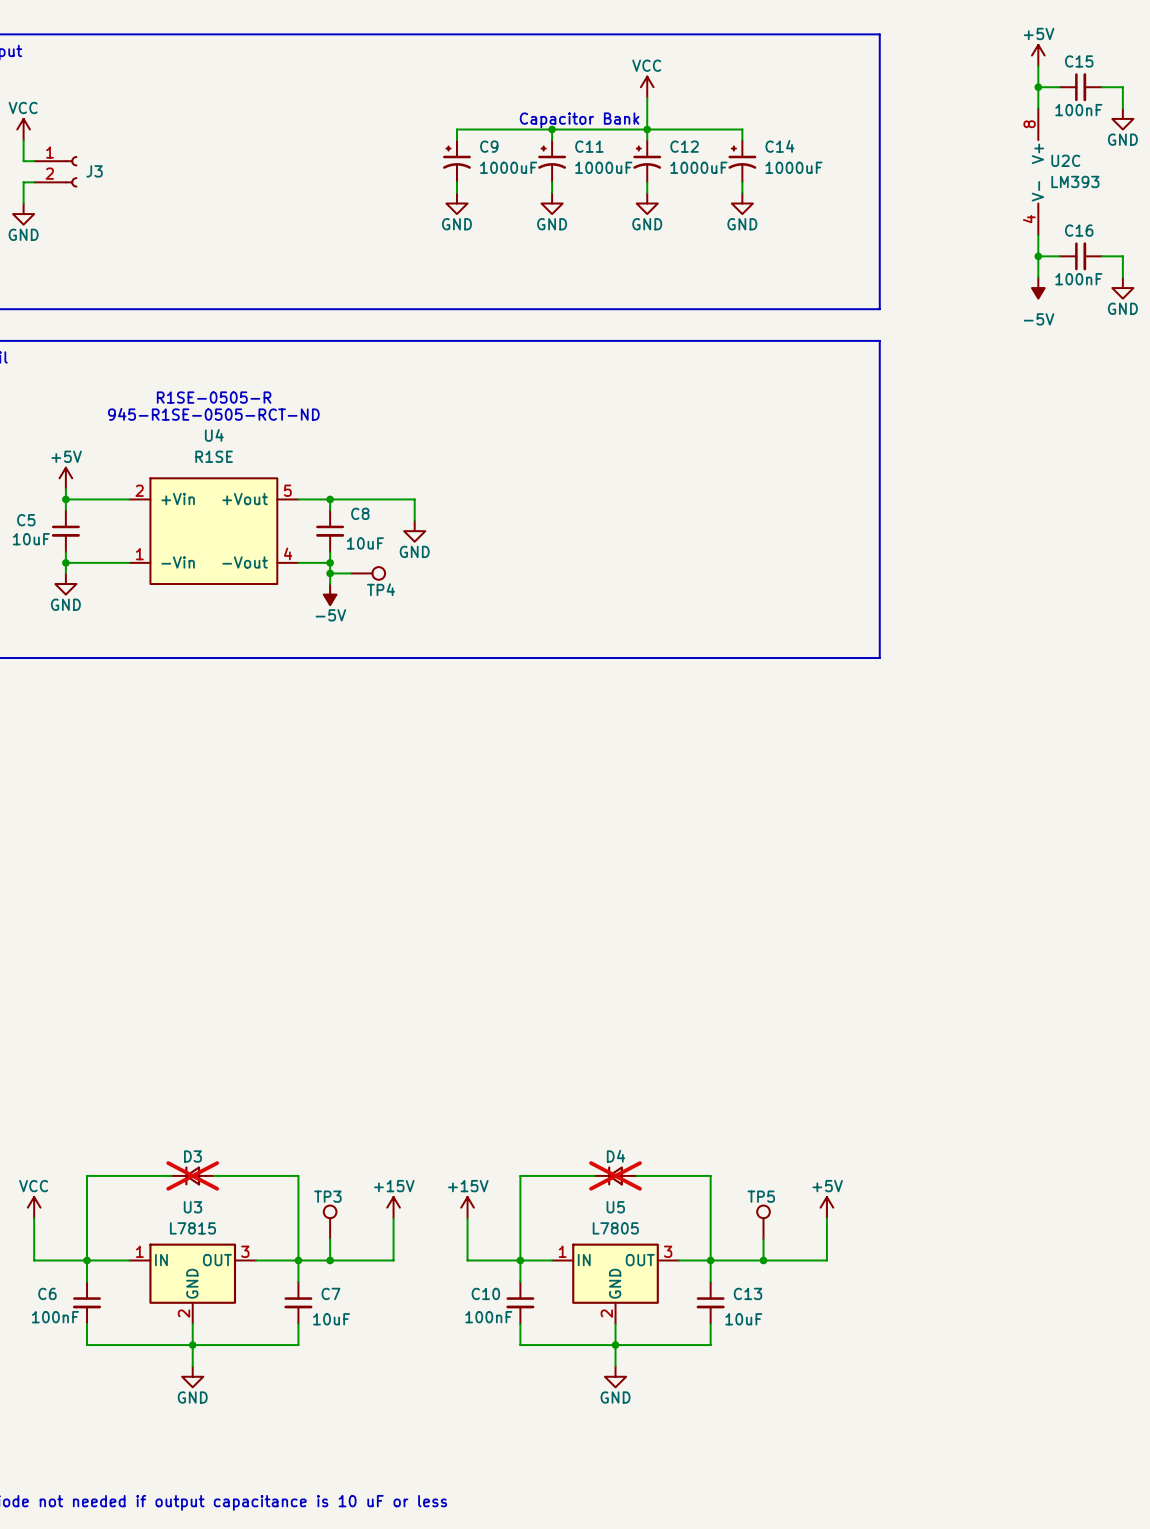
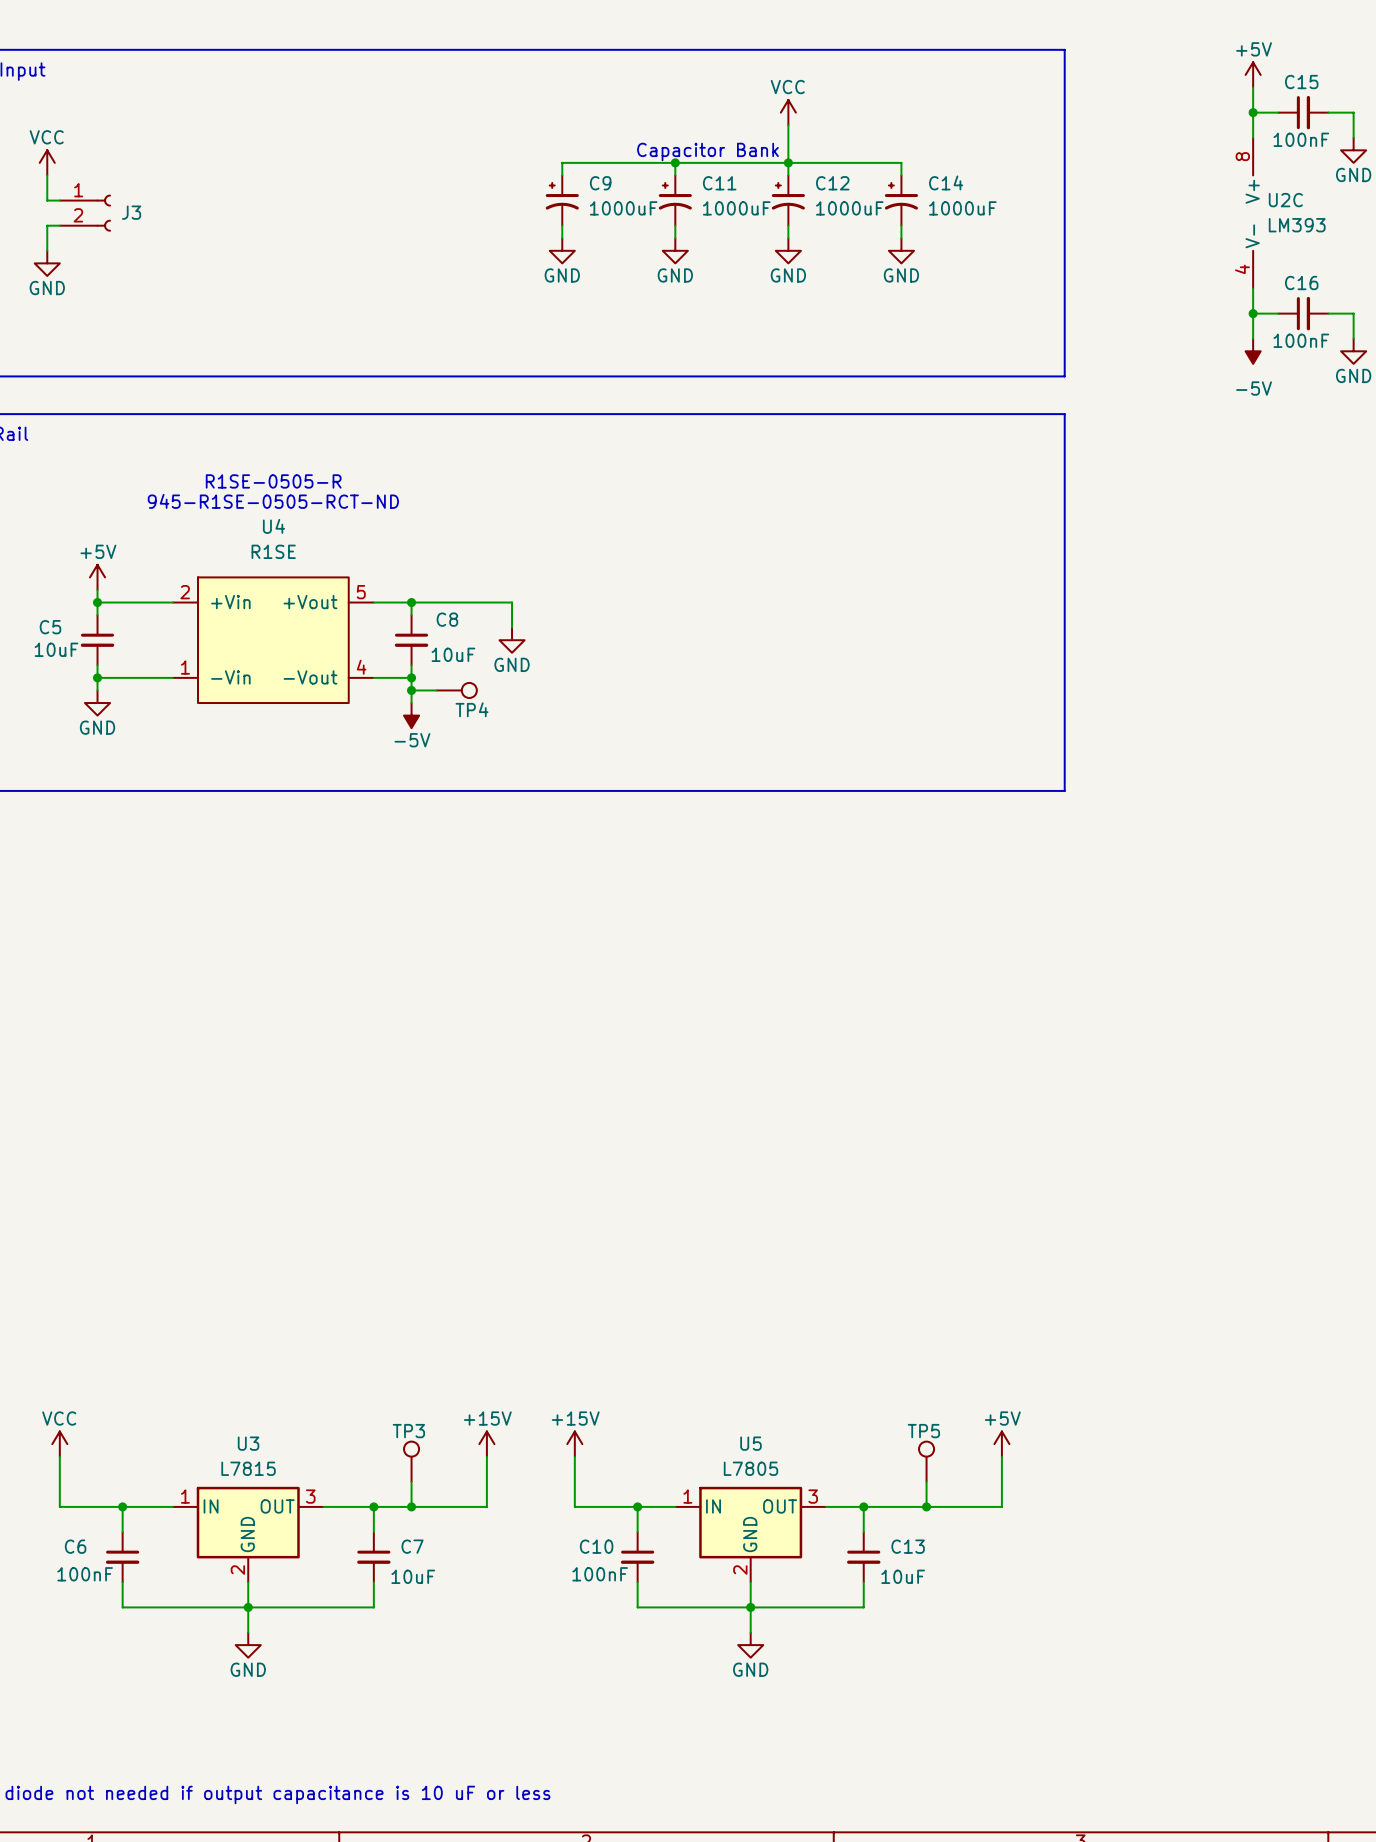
wire: (171, 1175) (87, 1175) (87, 1260) -> none
D3: (192, 1175) -> none
wire: (213, 1175) (298, 1175) (298, 1260) -> none
wire: (594, 1175) (520, 1175) (520, 1260) -> none
D4: (615, 1175) -> none
wire: (636, 1175) (710, 1175) (710, 1260) -> none

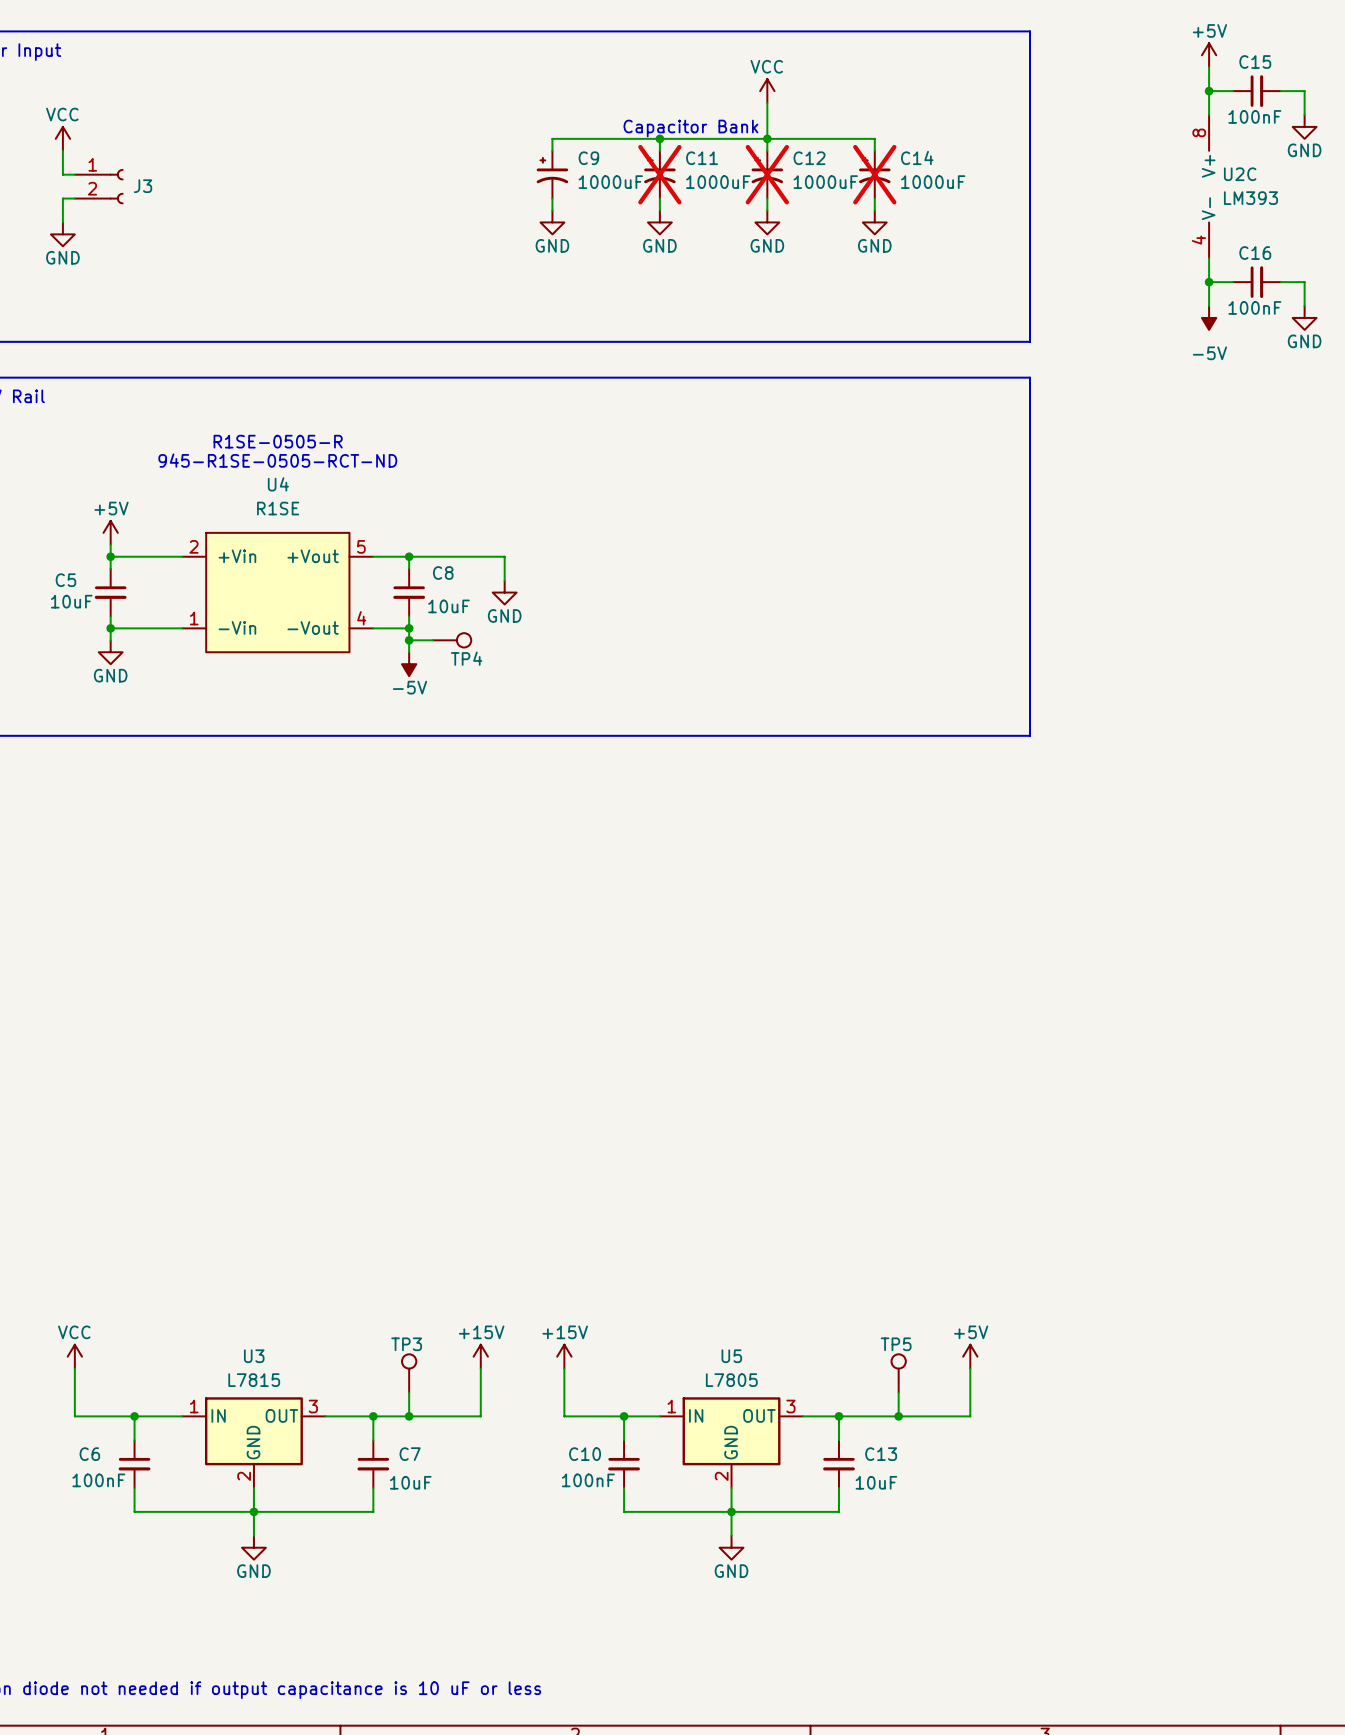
C11 do-not-place cross: none -> (659, 174)
C12 do-not-place cross: none -> (767, 174)
C14 do-not-place cross: none -> (874, 174)

